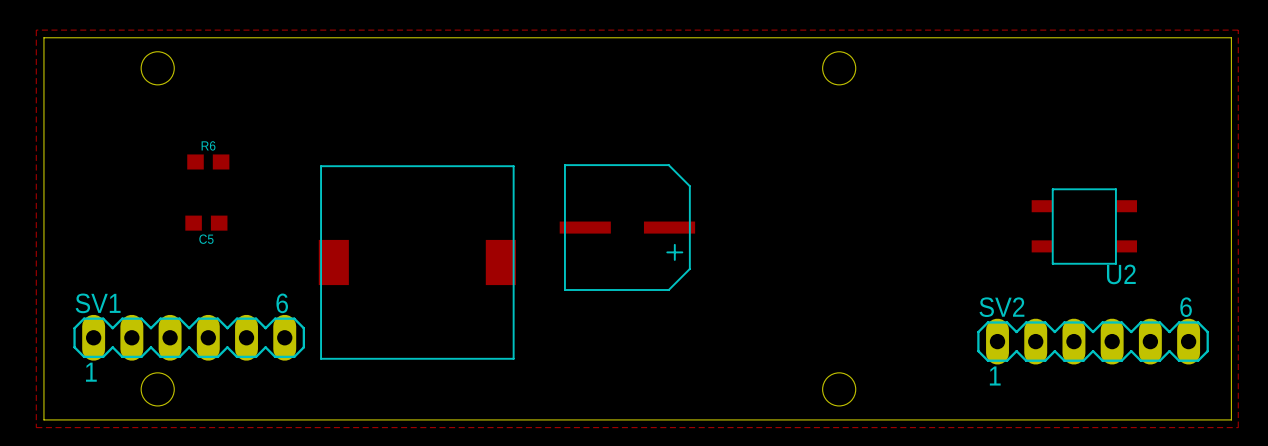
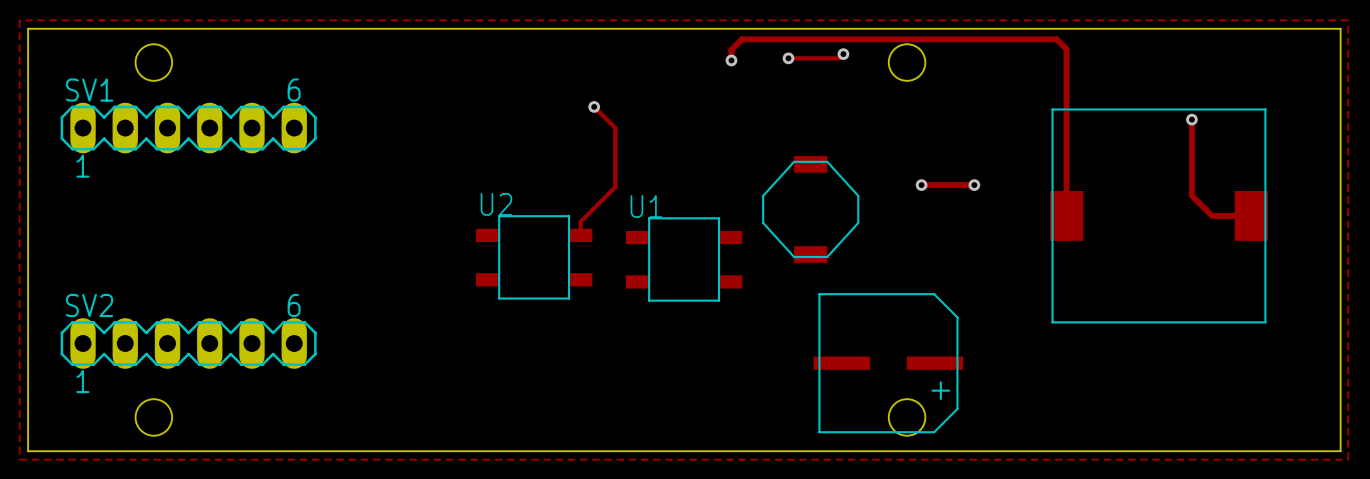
track: none -> (843, 54) (839, 58) (788, 58)
via: none -> (843, 54)
via: none -> (788, 58)
track: none -> (731, 60) (731, 49) (742, 39) (1056, 39) (1066, 49) (1066, 215)
via: none -> (731, 60)
track: none -> (594, 106) (615, 128) (615, 187) (580, 221) (580, 235)
via: none -> (594, 106)
track: none -> (1191, 119) (1191, 195) (1212, 215) (1251, 215)
via: none -> (1191, 119)
R6: (208, 161) -> none
track: none -> (921, 185) (974, 185)
via: none -> (921, 185)
via: none -> (974, 185)
part: none -> (810, 209)
part: none -> (1158, 215)
C5: (206, 223) -> none
U2 rotation: 0° (1084, 226) -> 180° (534, 257)
U2 position: (1084, 226) -> (534, 257)
part position: (627, 227) -> (888, 363)
U1: none -> (684, 259)
part: (417, 262) -> none
SV1 position: (189, 337) -> (188, 128)
SV2 position: (1093, 341) -> (188, 343)

